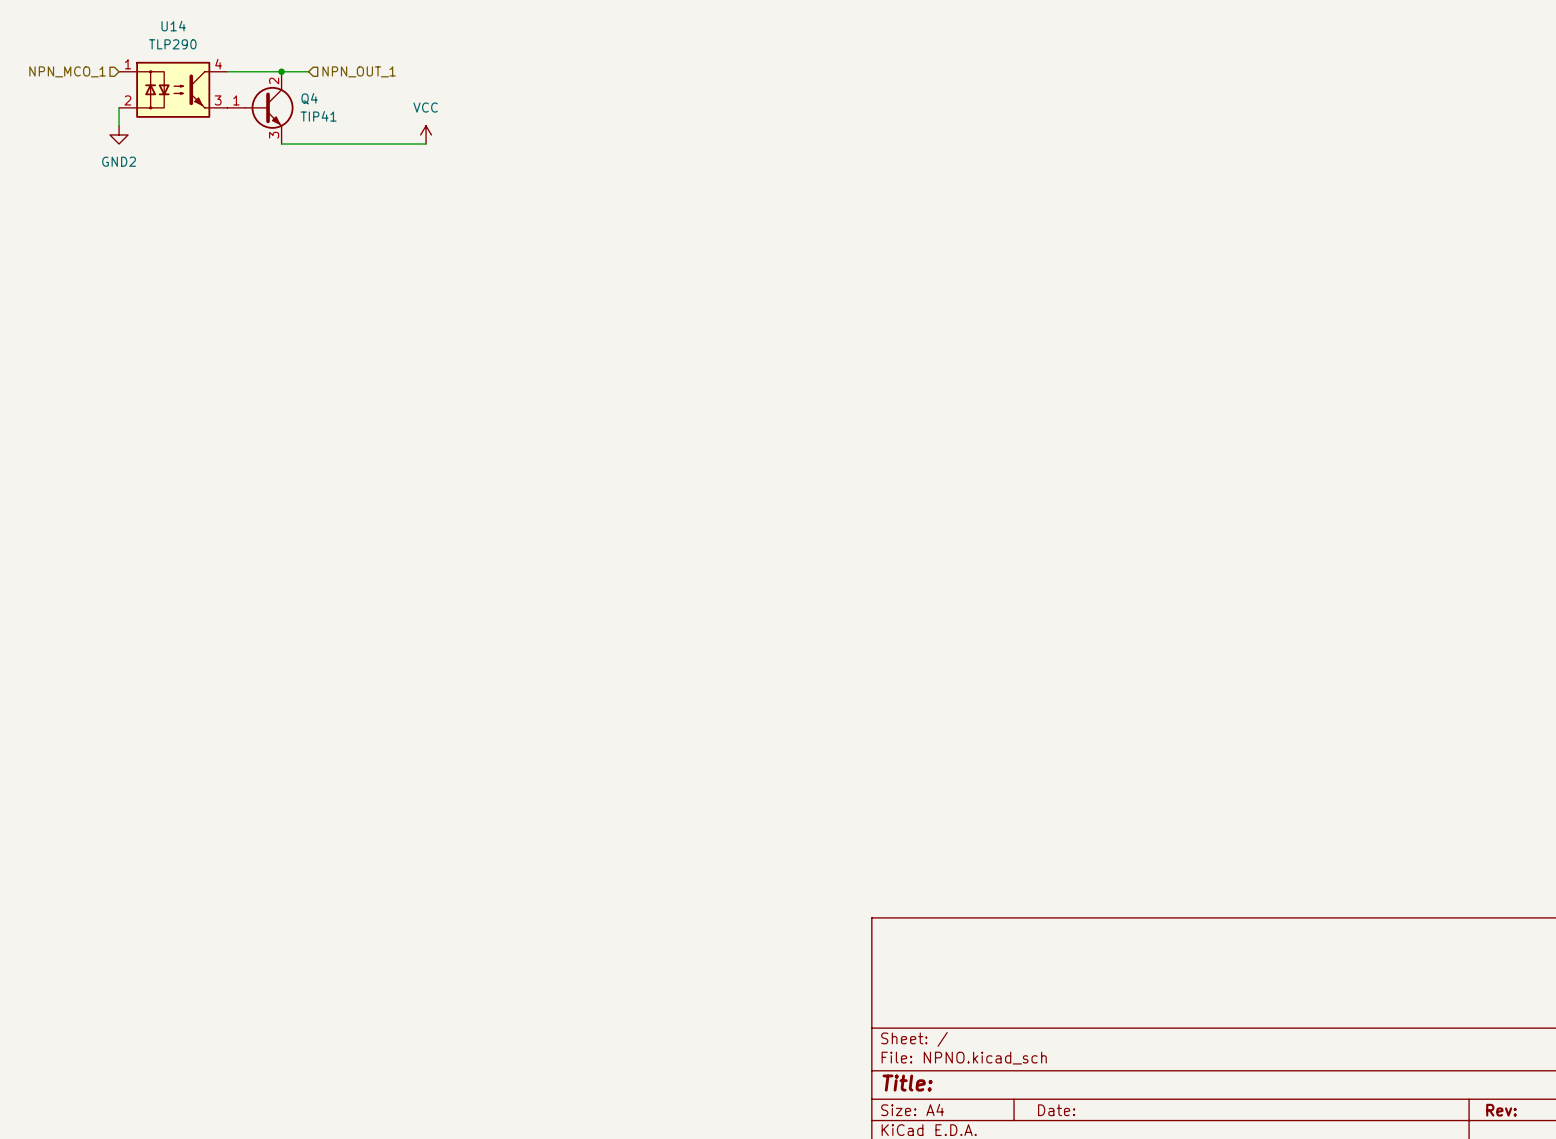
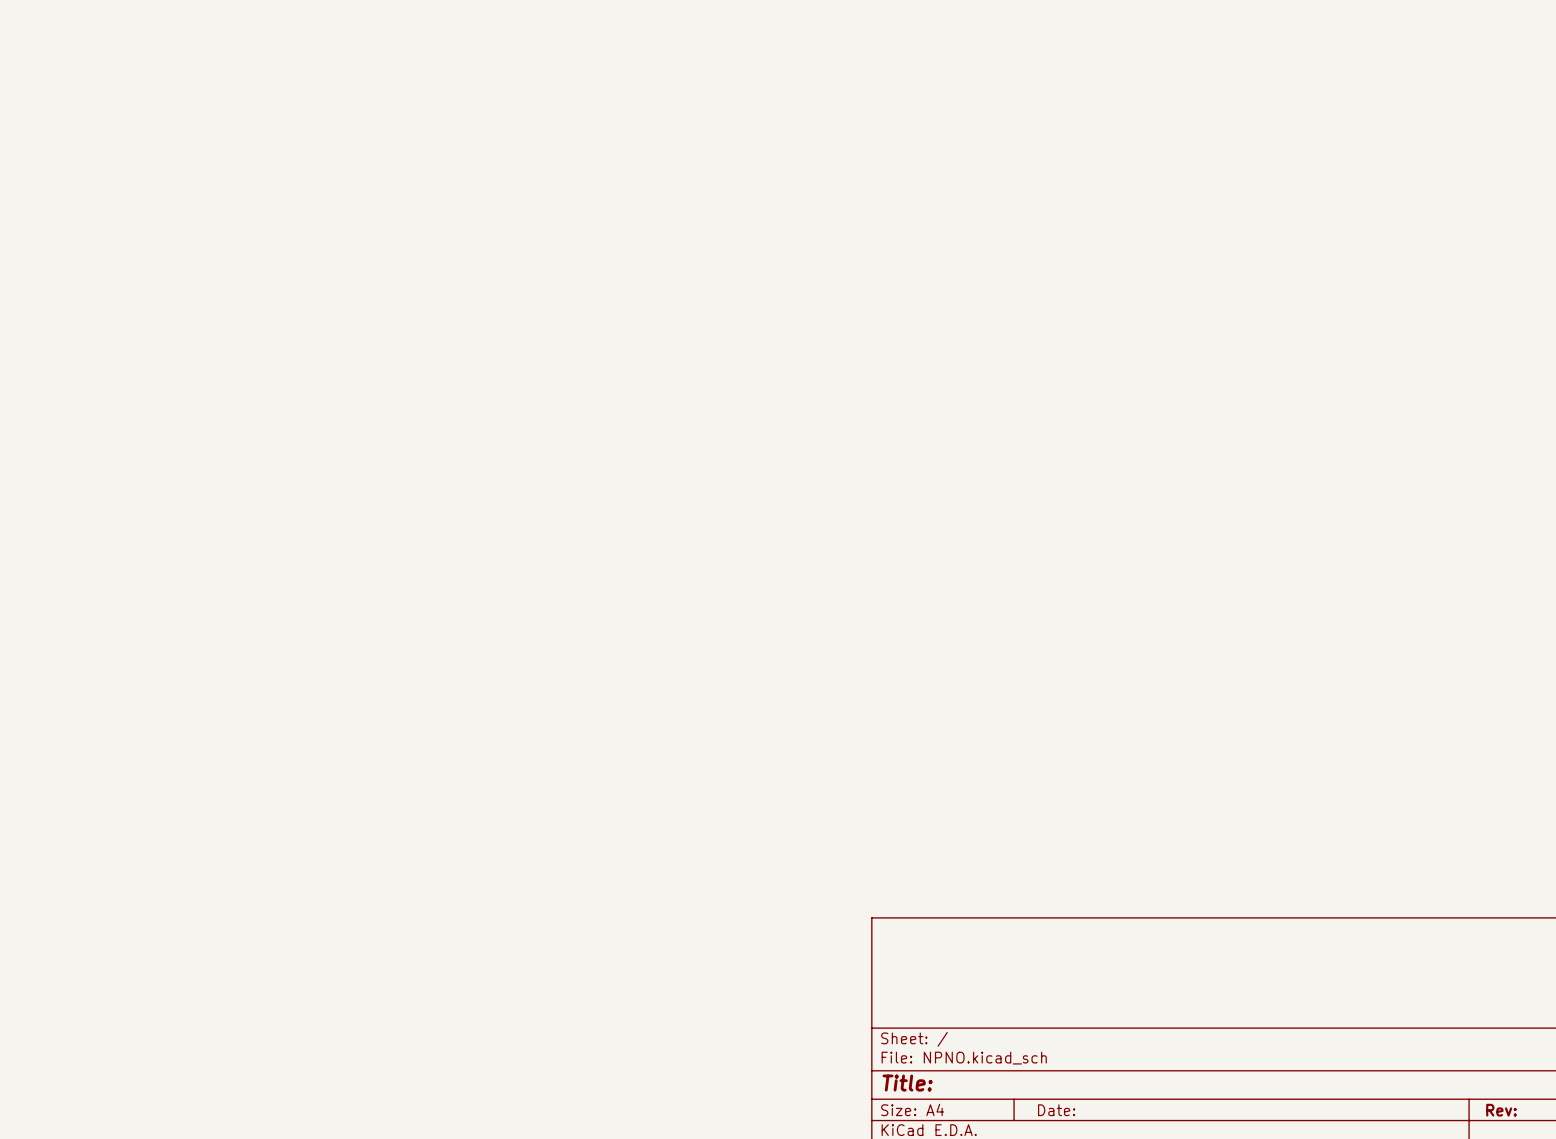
hierarchical label: NPN_MCO_1 (67, 71) -> none
wire: (227, 71) (308, 71) -> none
junction: (281, 71) -> none
hierarchical label: NPN_OUT_1 (359, 71) -> none
U14: TLP290 (173, 89) -> none
wire: (119, 107) (119, 125) -> none
Q4: TIP41 (260, 107) -> none
power symbol: GND2 (119, 134) -> none
power symbol: VCC (426, 134) -> none
wire: (281, 144) (426, 144) -> none

